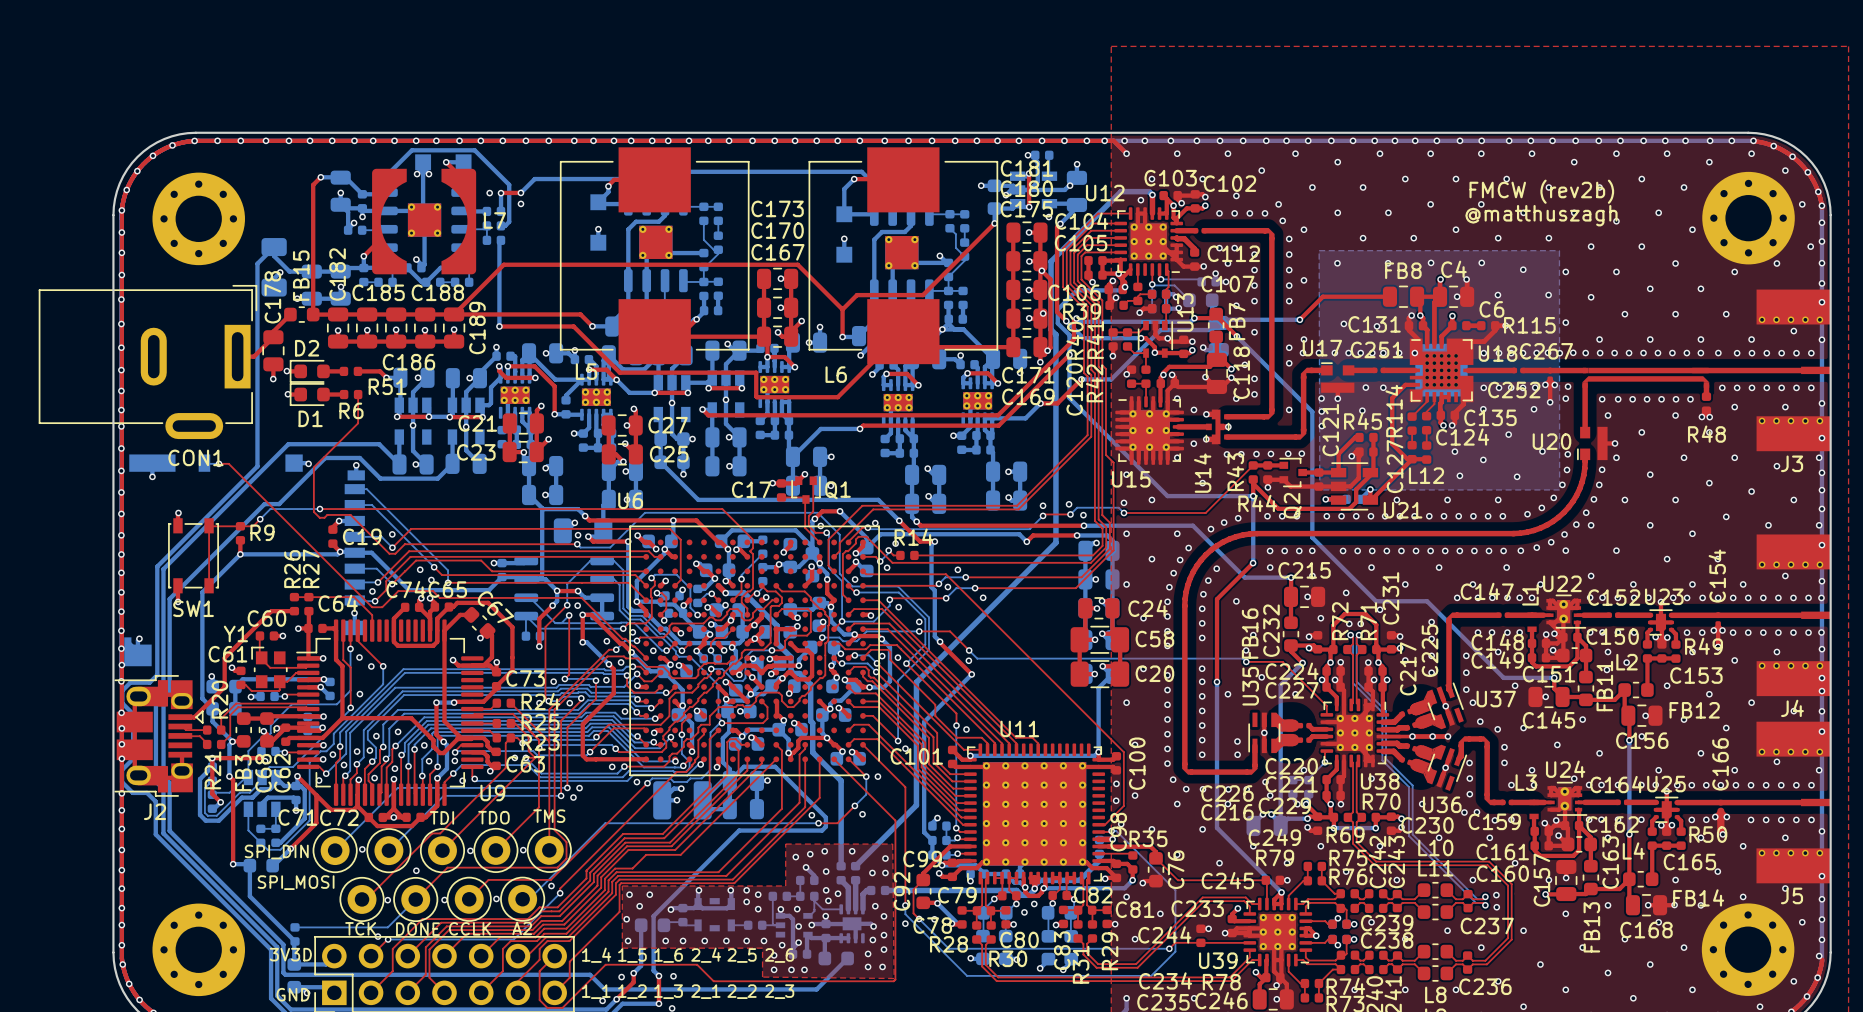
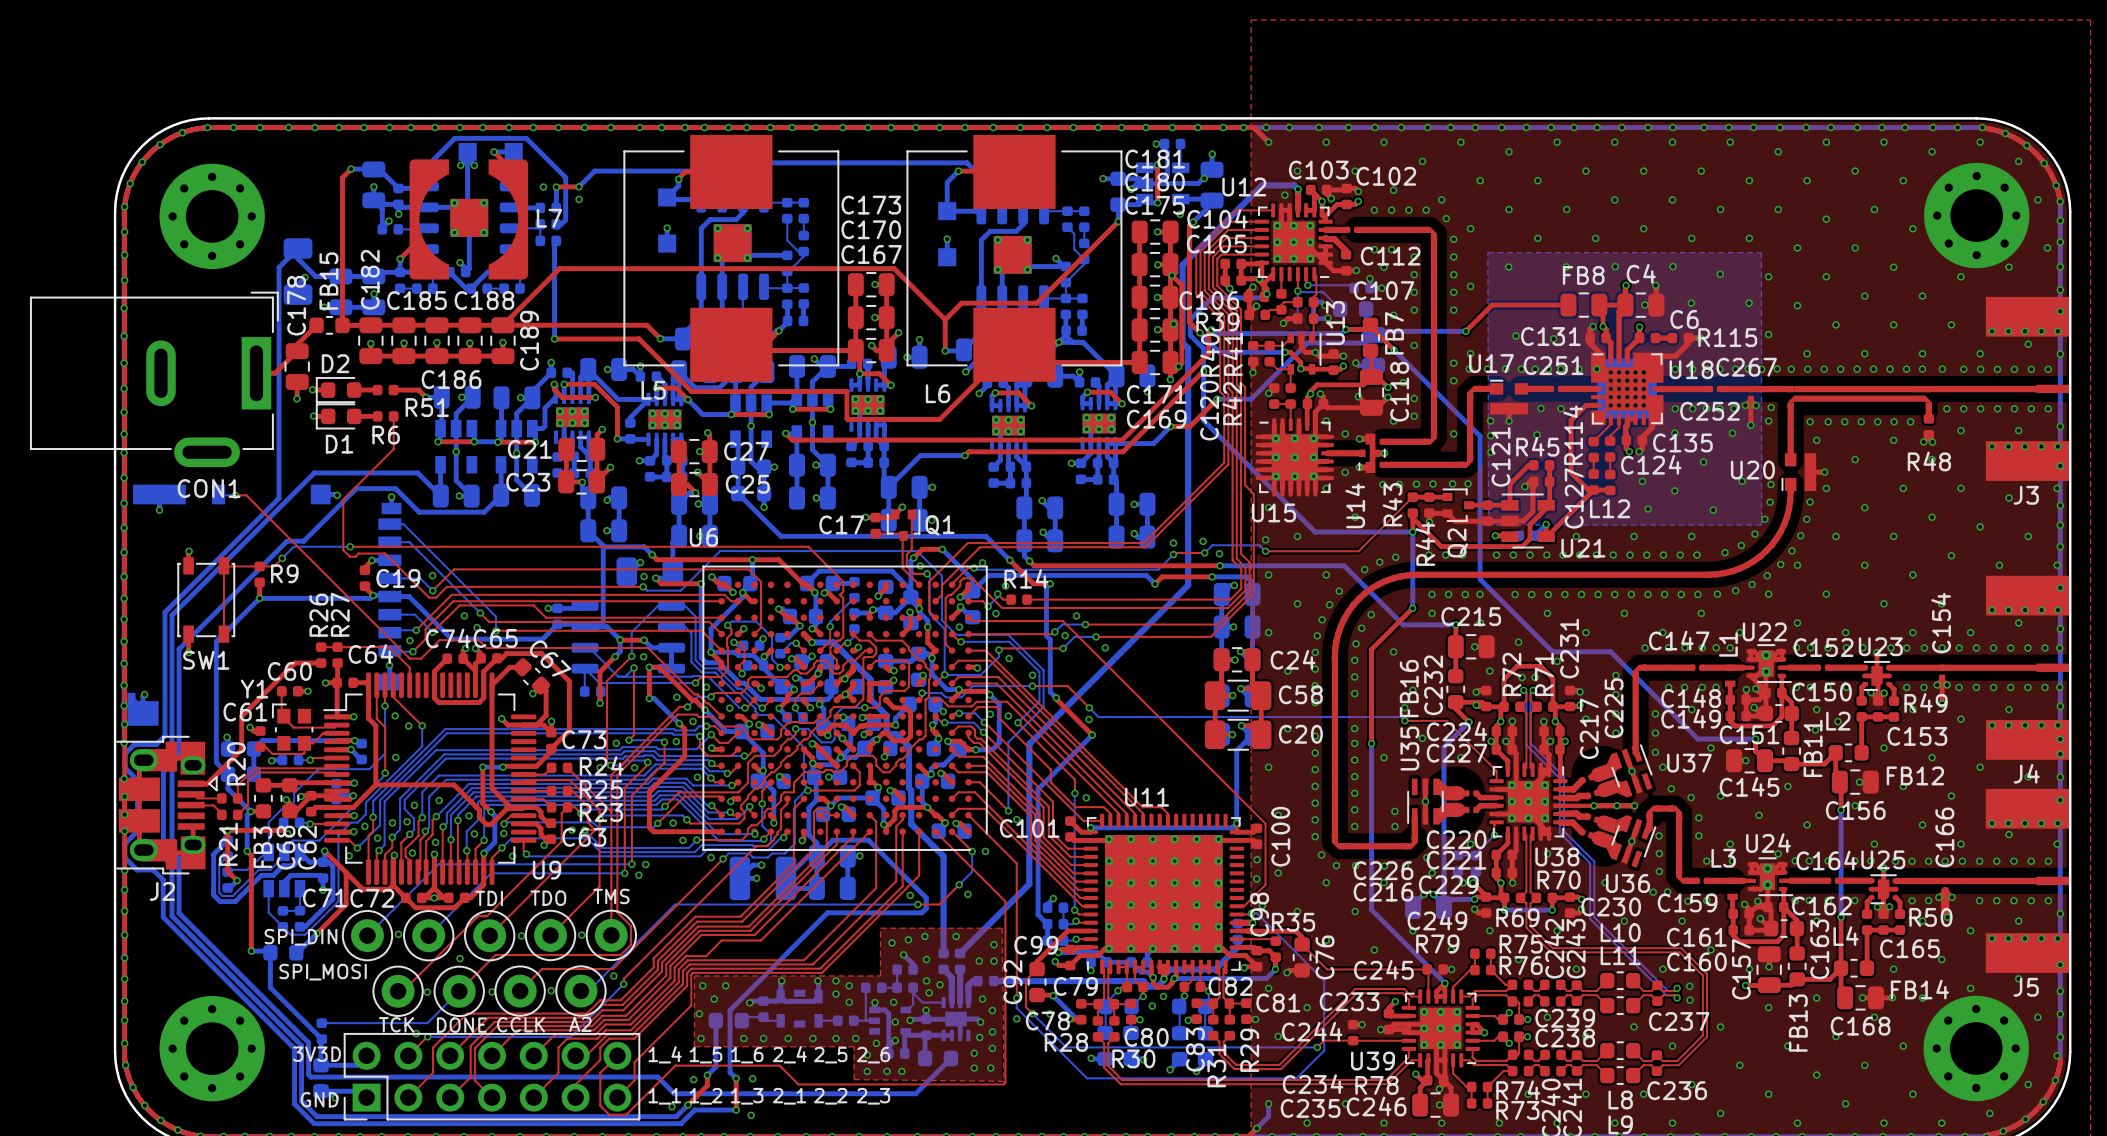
text: FMCW (rev2b) (1541, 191) -> none
text: @matthuszagh (1541, 215) -> none
R44 name rotation: 0° (1257, 503) -> 90° counterclockwise (1425, 543)

